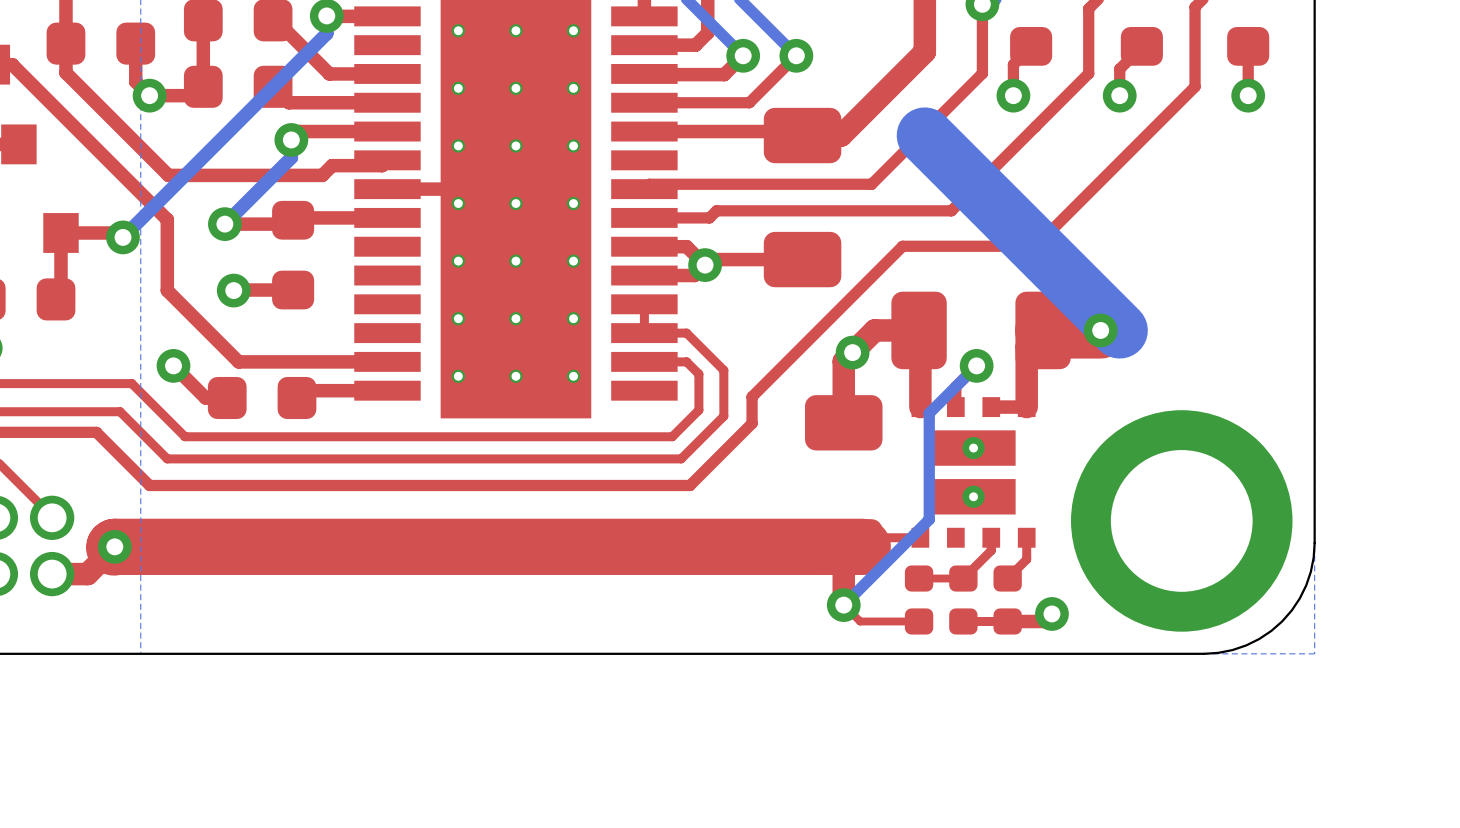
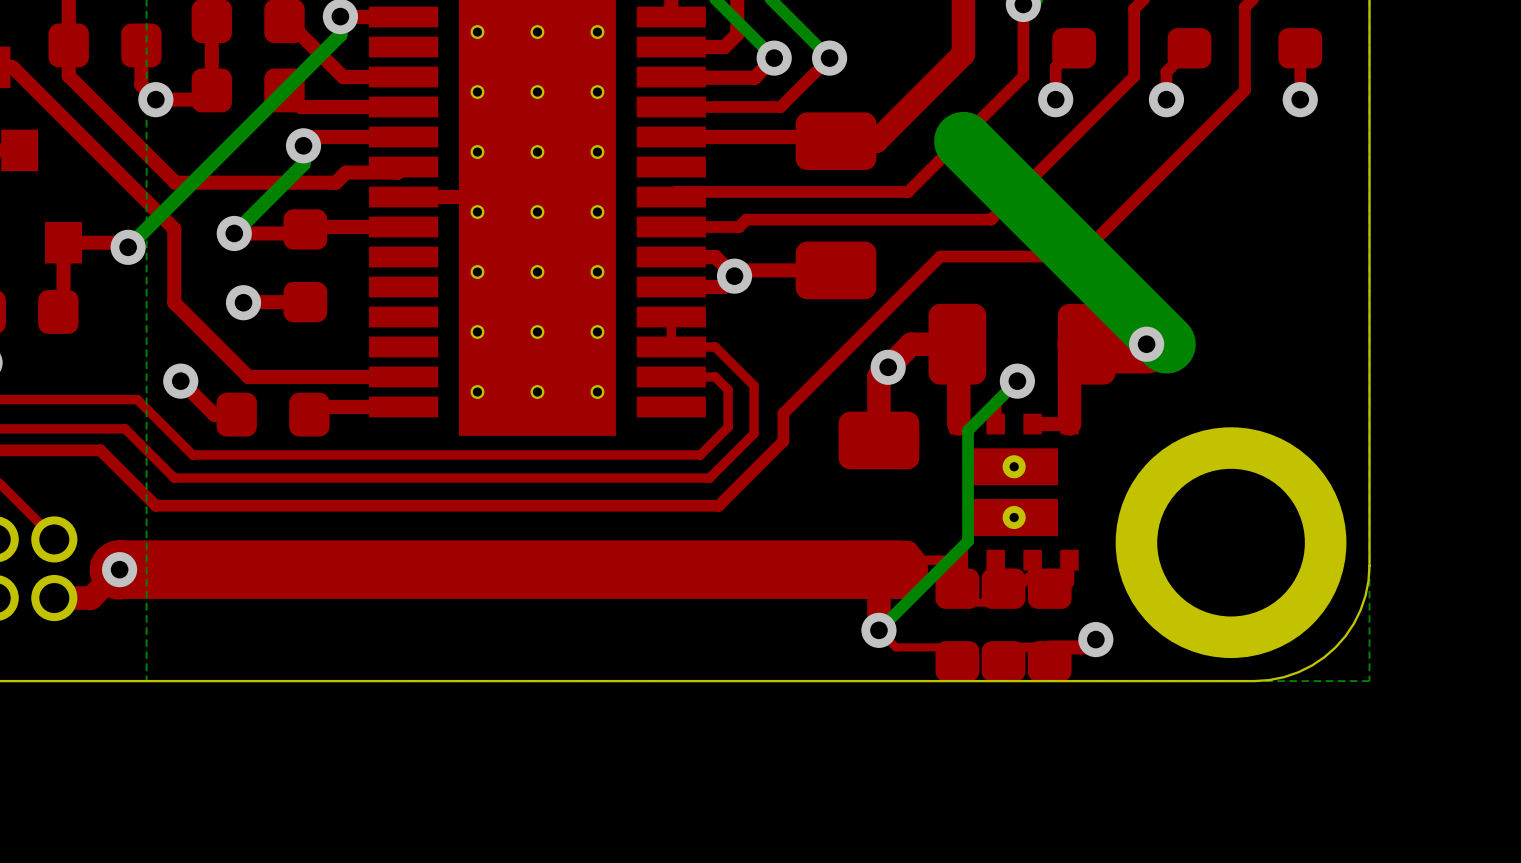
part footprint: [904, 565, 934, 635] -> [935, 568, 980, 682]
part footprint: [949, 565, 978, 635] -> [981, 568, 1026, 682]
part footprint: [993, 565, 1022, 635] -> [1027, 568, 1072, 682]

